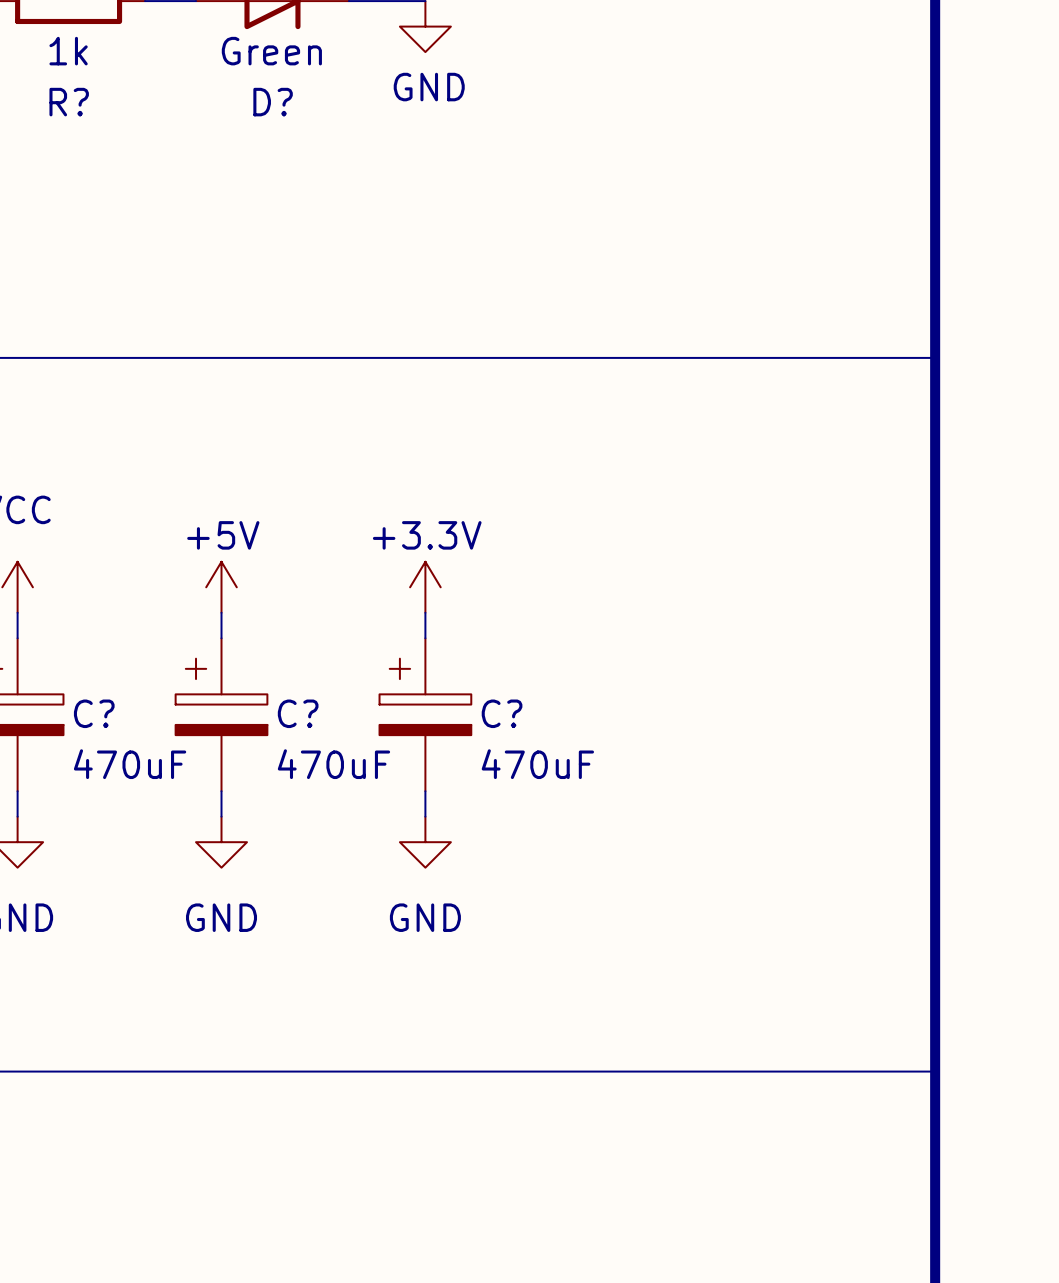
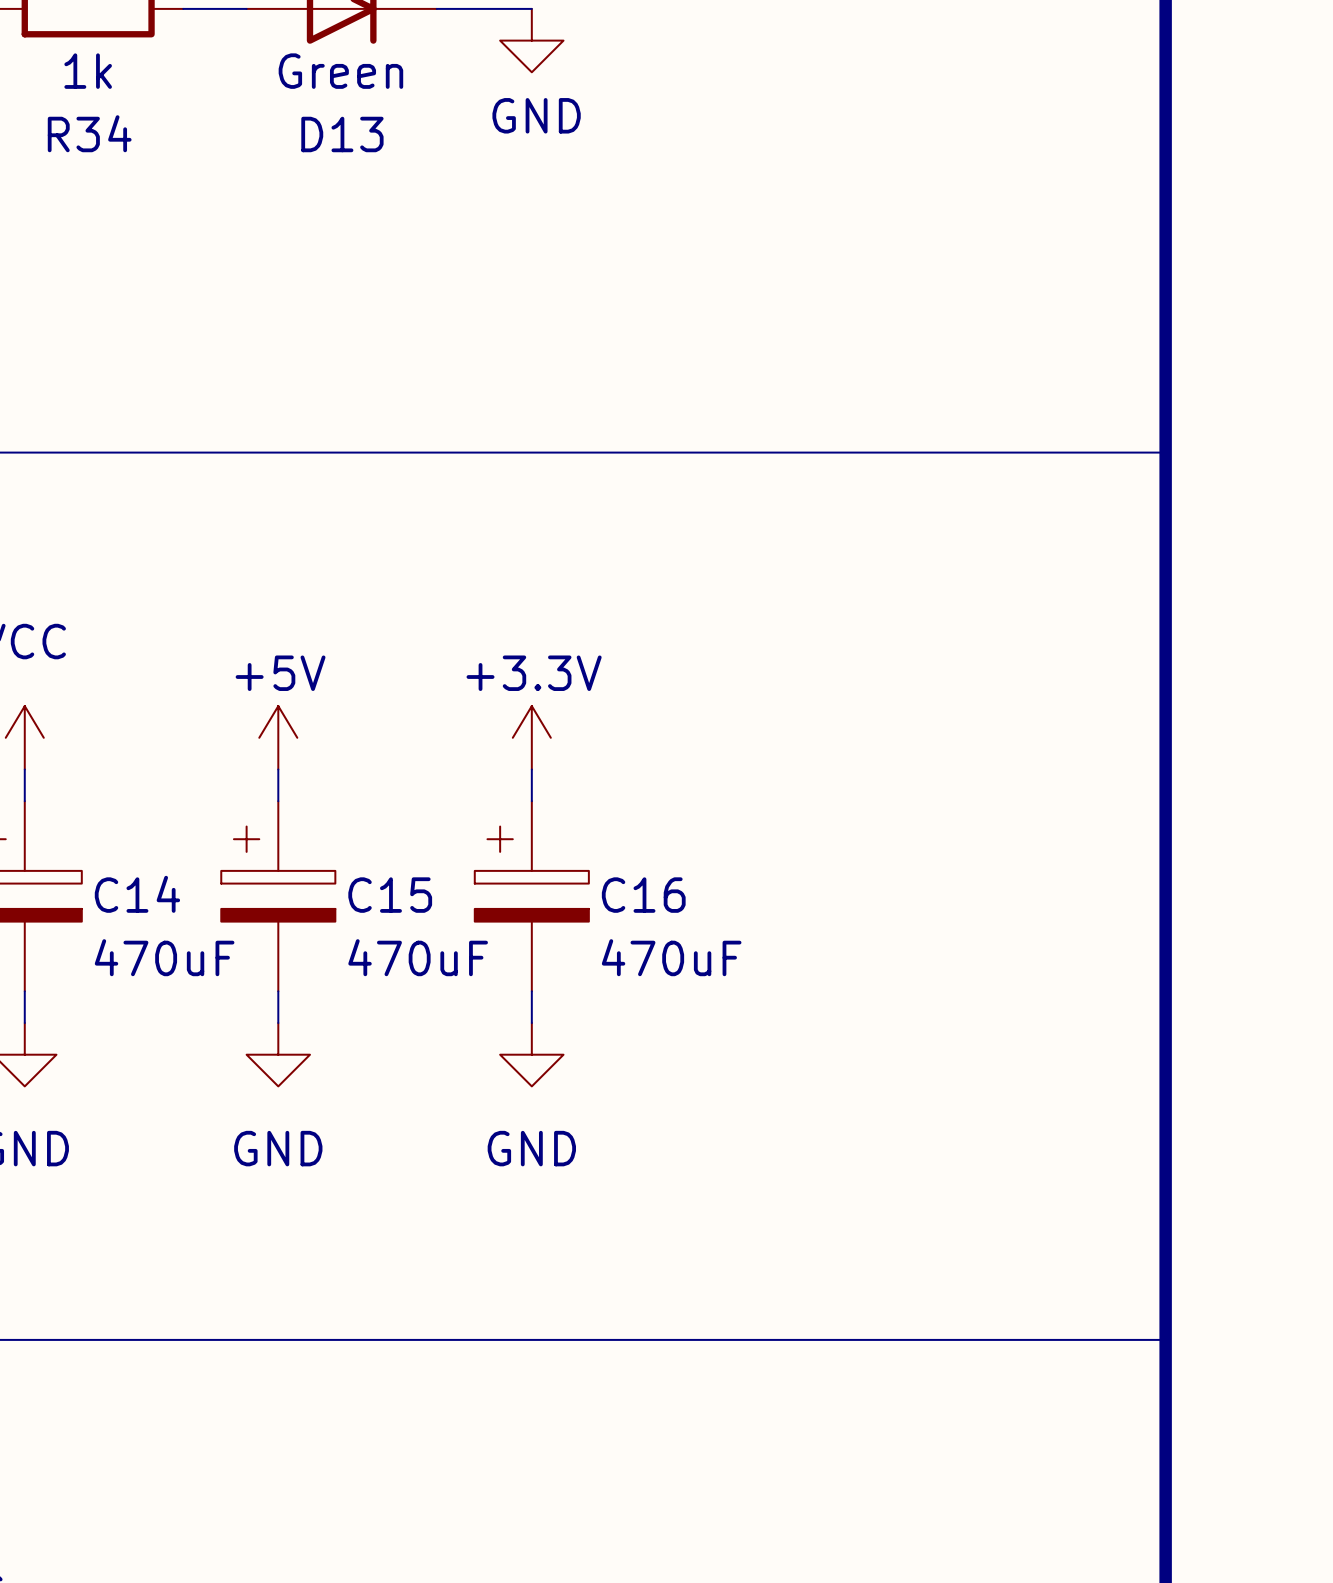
R? name: R? (69, 102) -> R34 (89, 133)
D? name: D? (273, 102) -> D13 (342, 134)
C? name: C? (94, 713) -> C14 (137, 894)
C? name: C? (298, 713) -> C15 (390, 895)
C? name: C? (502, 713) -> C16 (643, 895)

